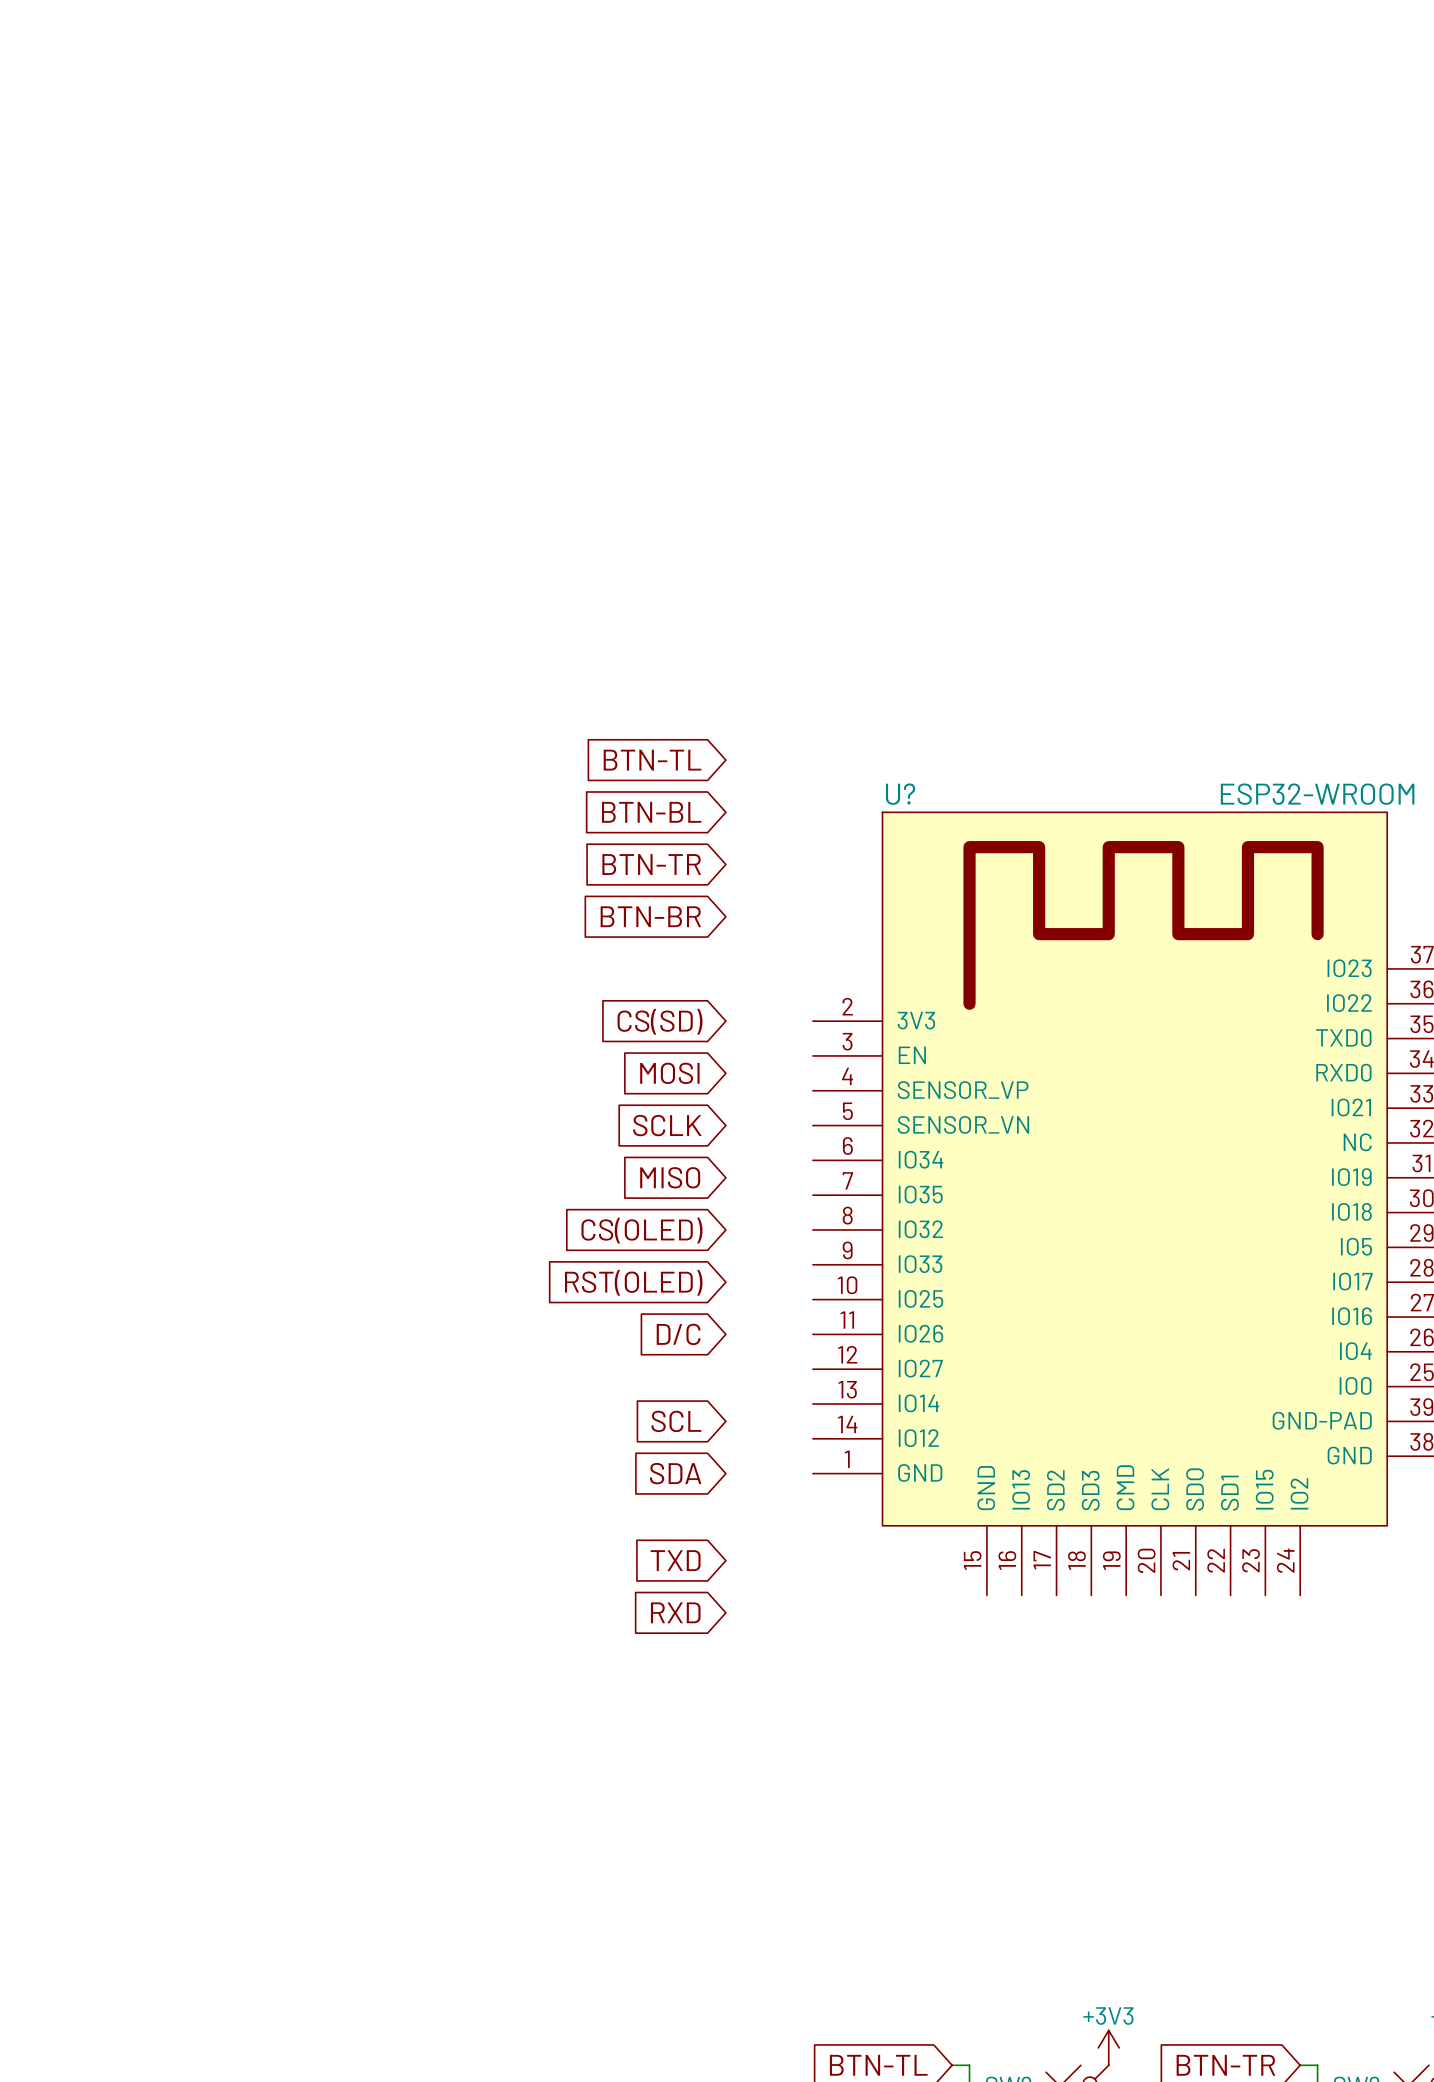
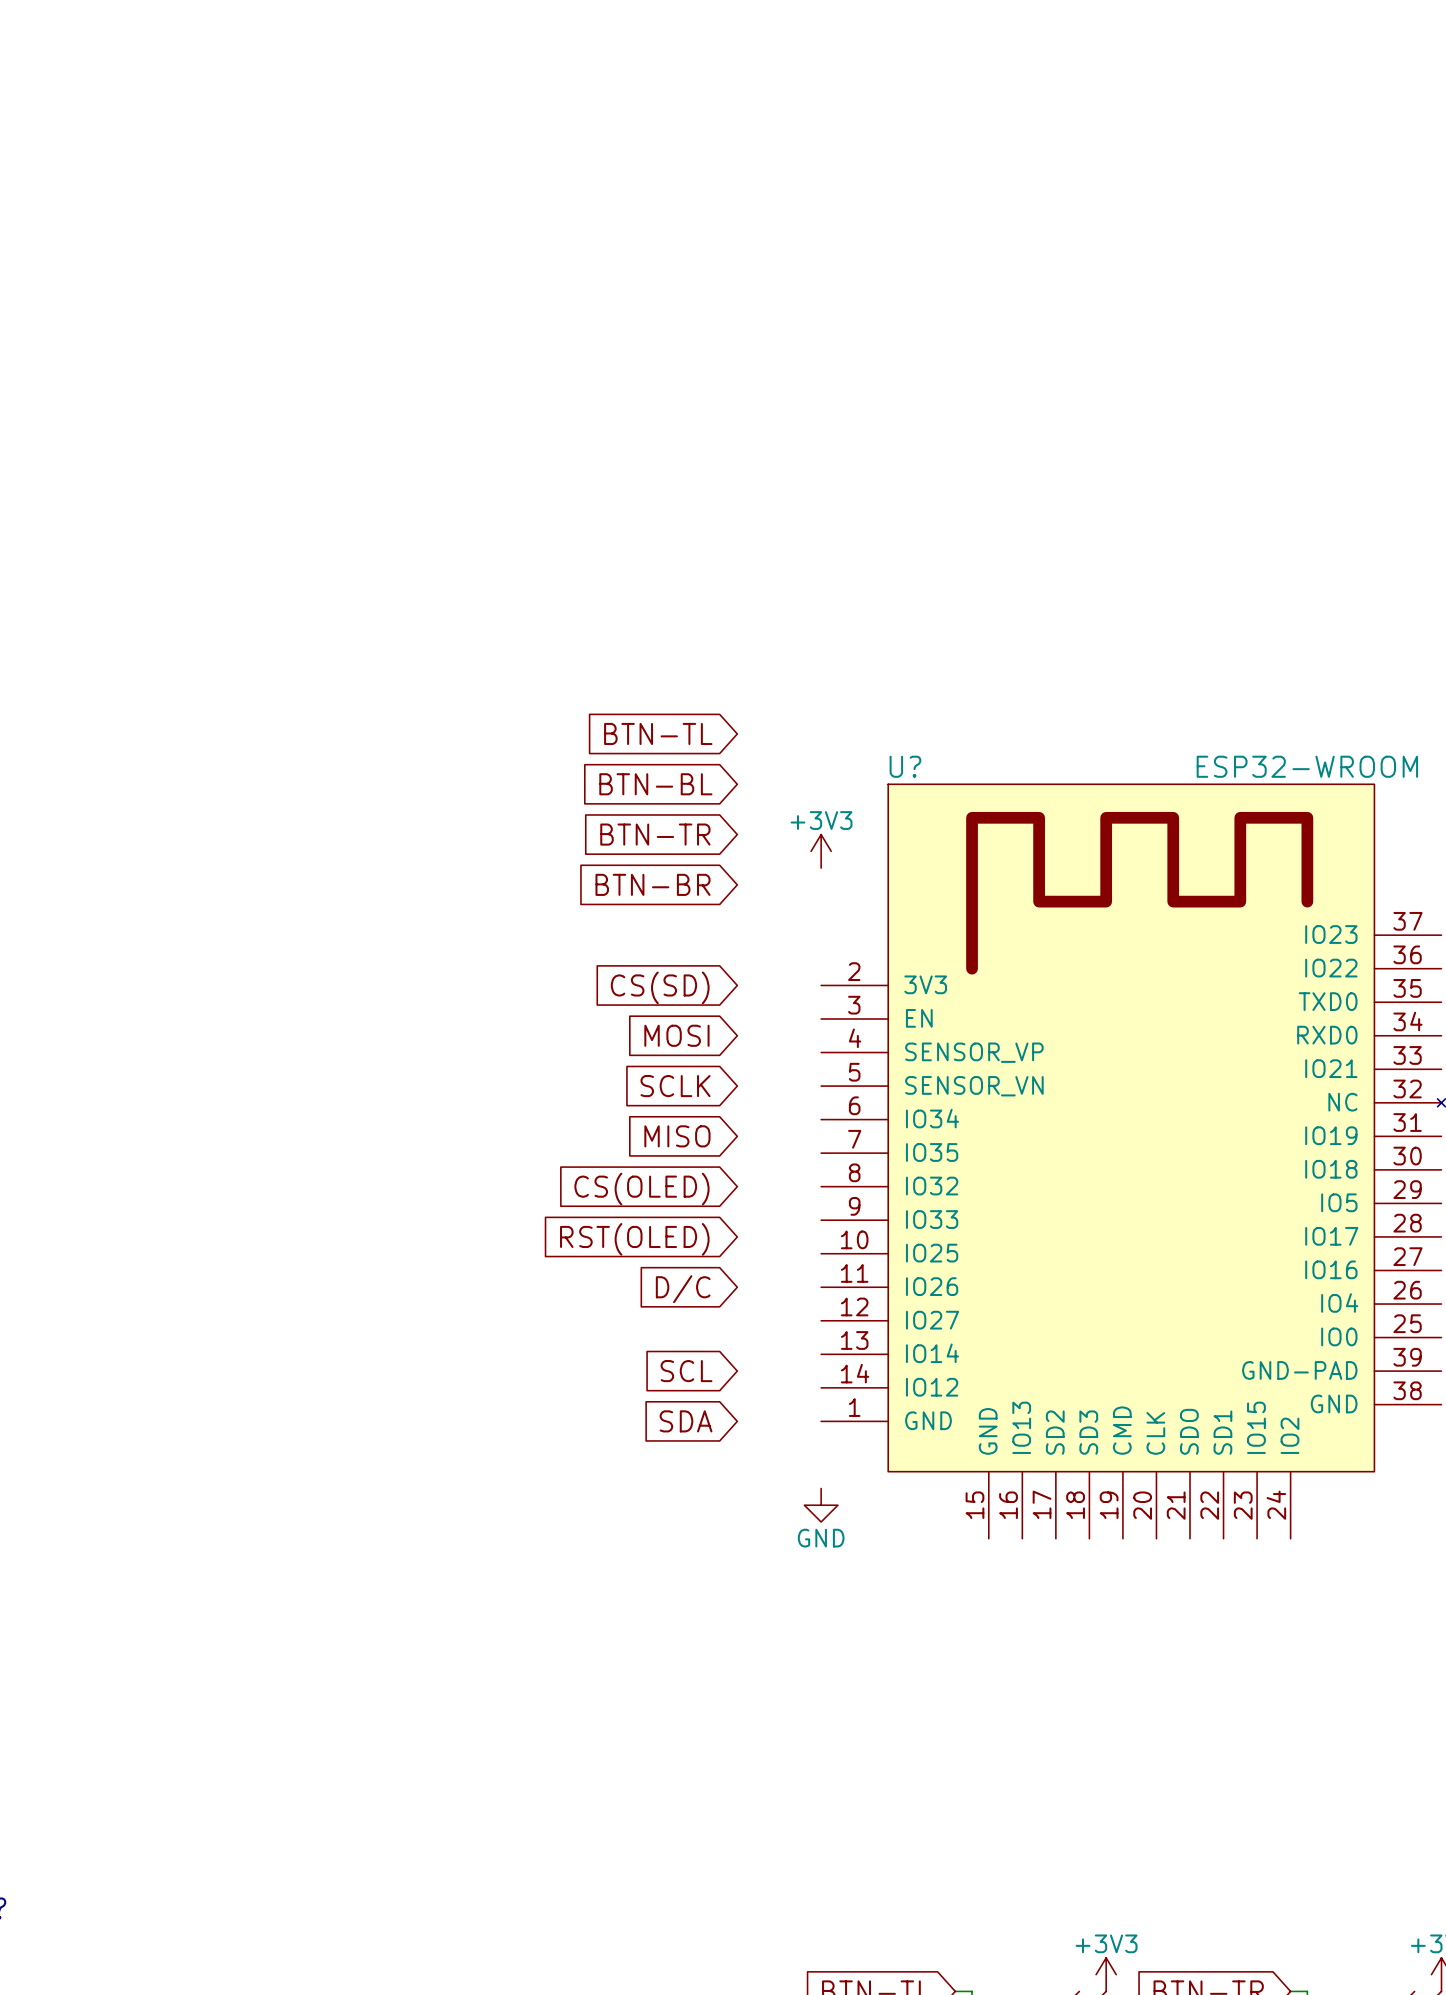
power symbol: none -> +3V3 (821, 851)
global label: TXD (675, 1560) -> none
power symbol: none -> GND (821, 1505)
global label: RXD (675, 1612) -> none

